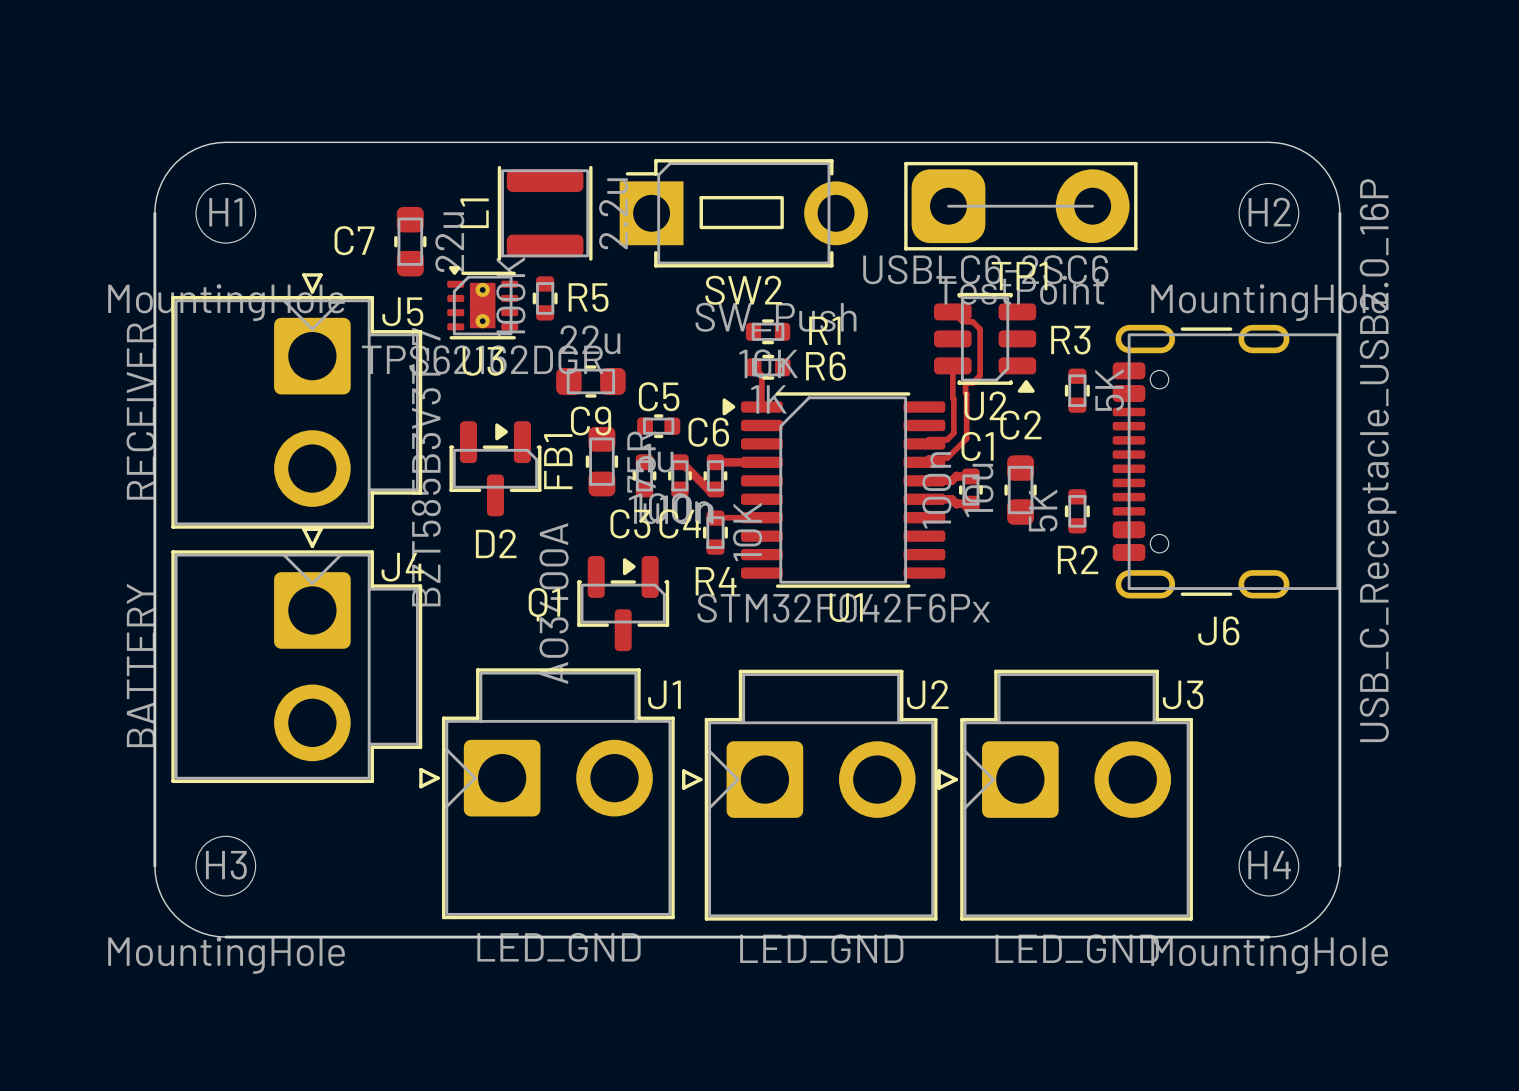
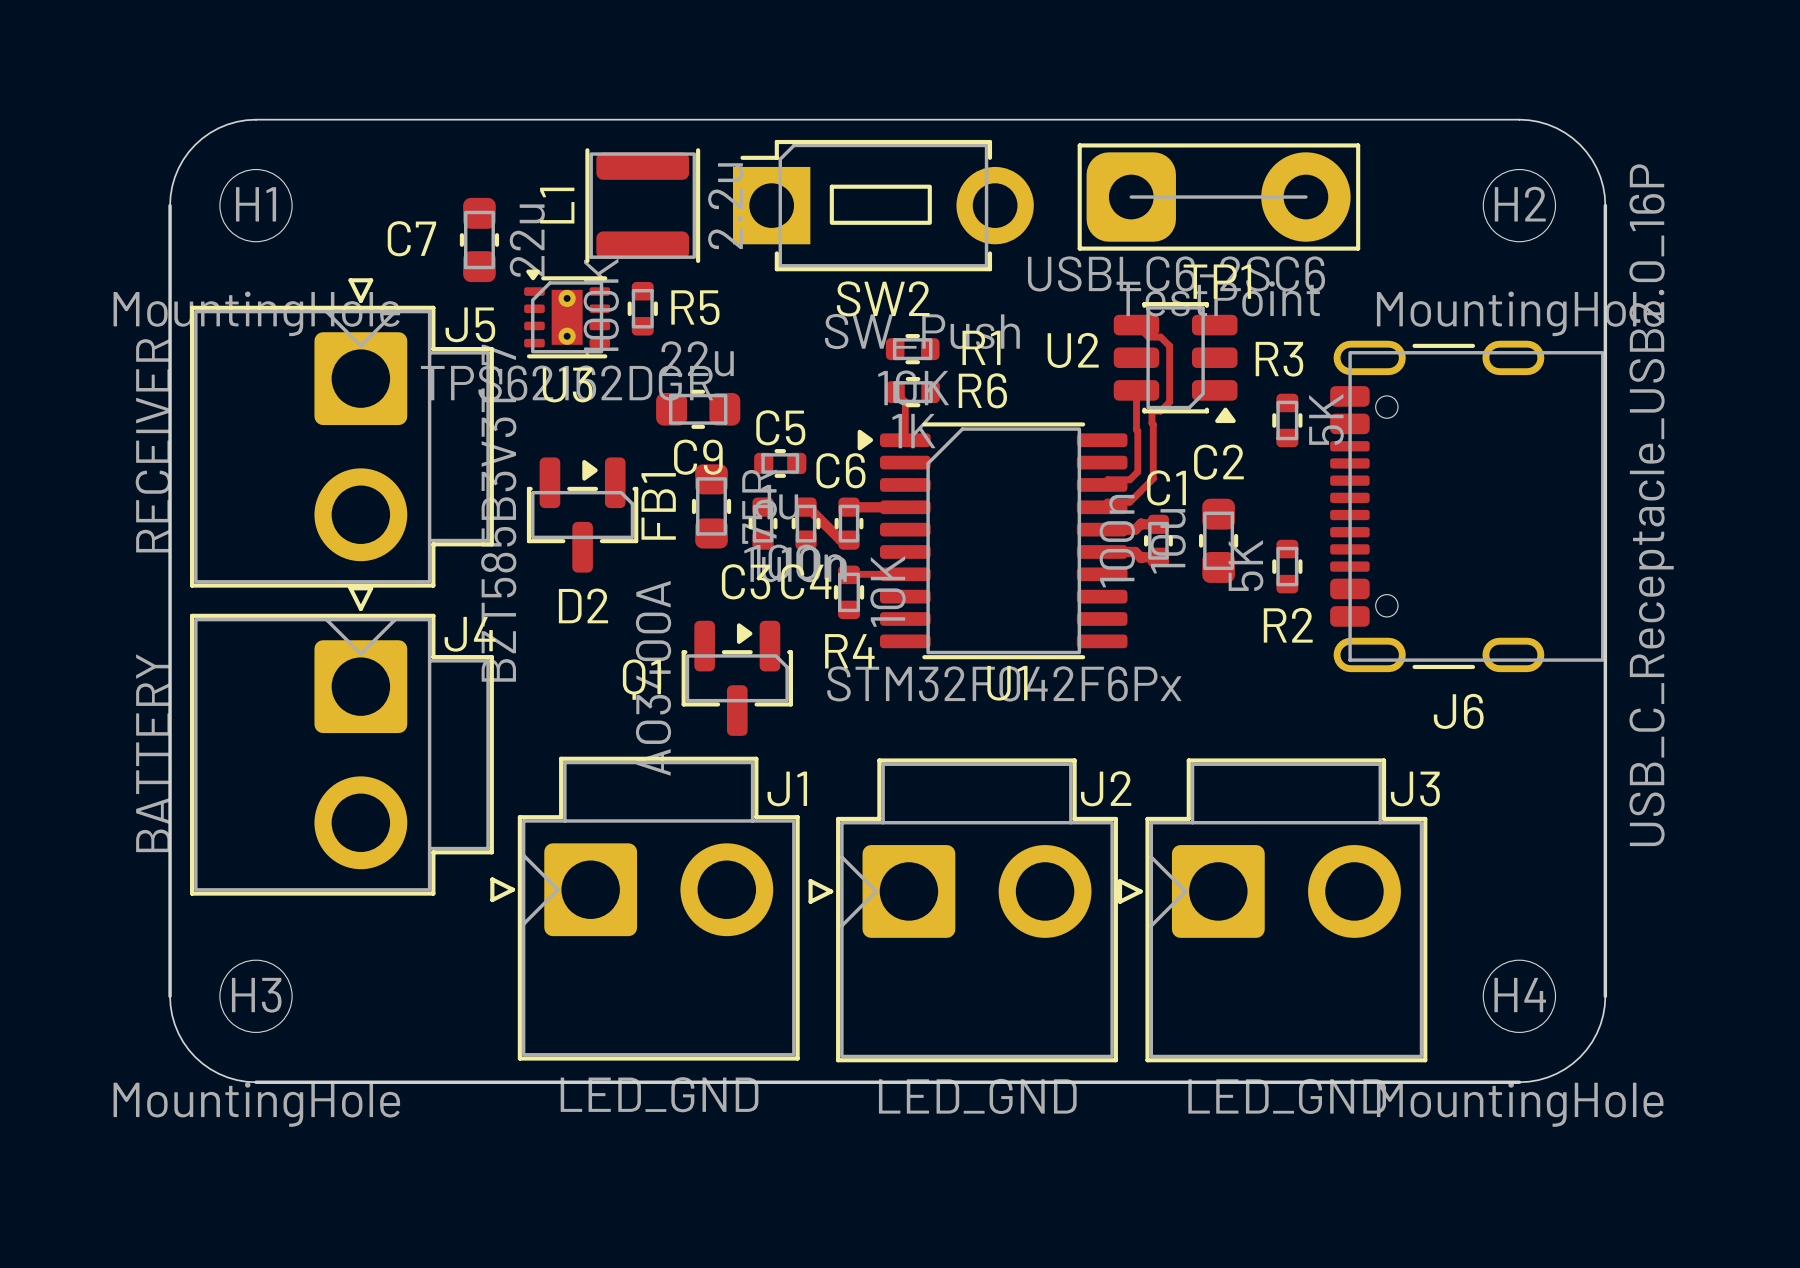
U2 name position: U2 (985, 405) -> U2 (1073, 350)

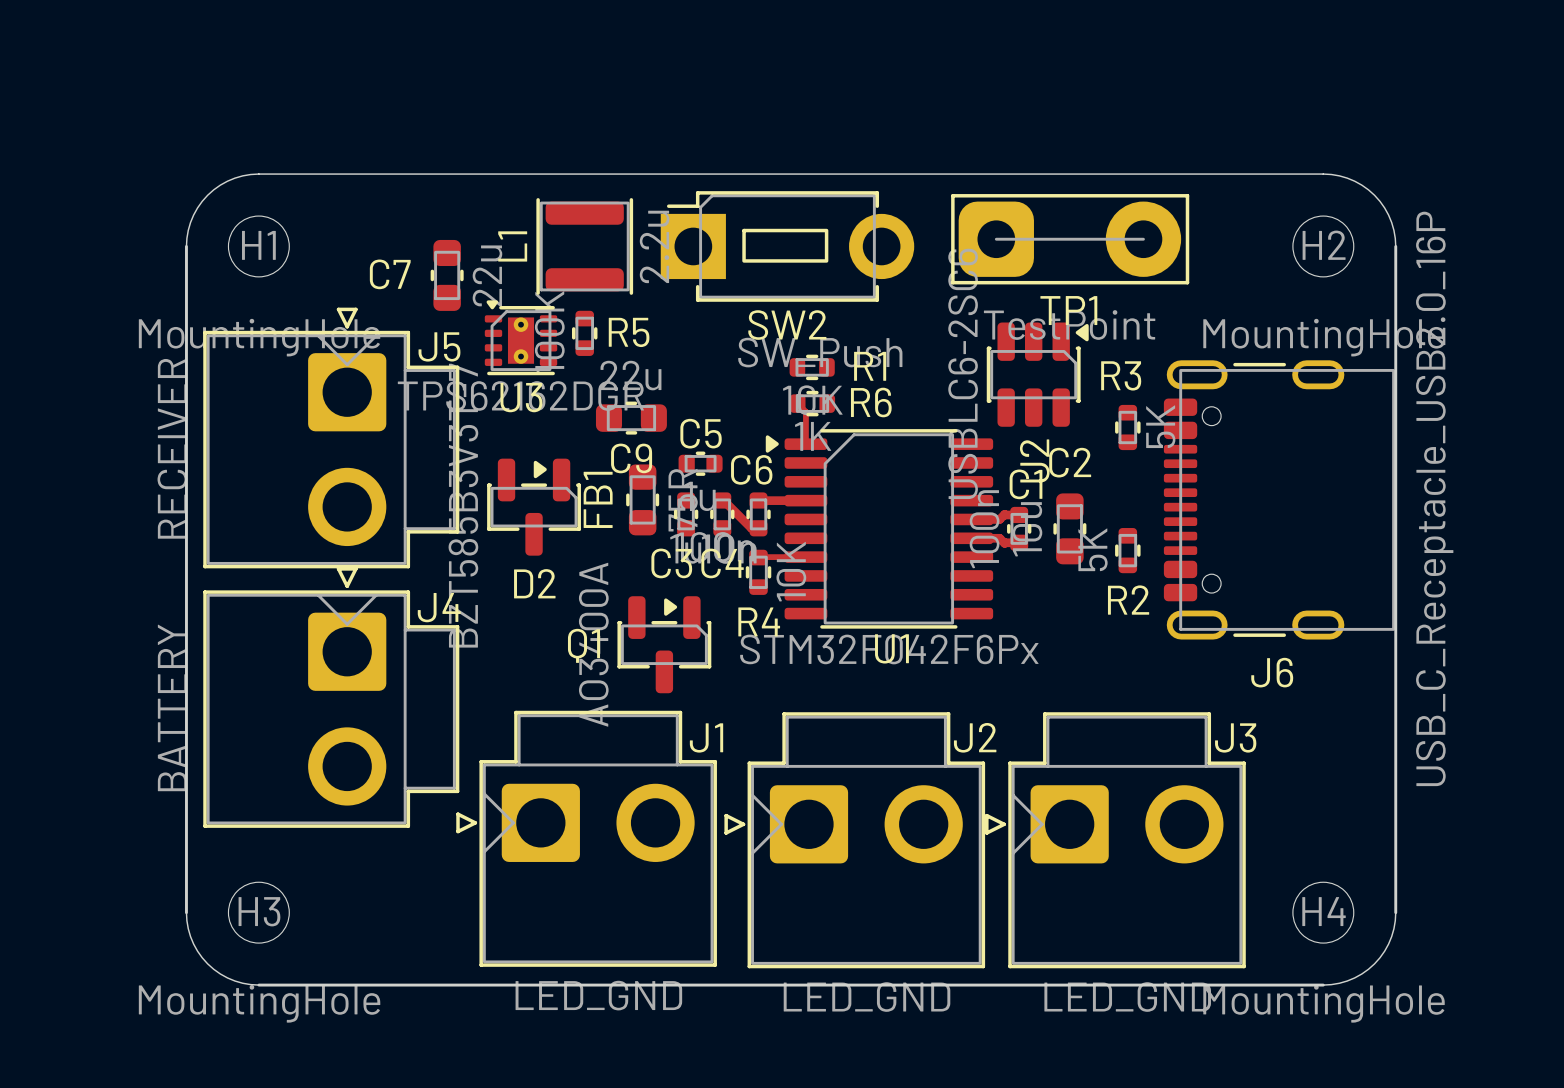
track: (1136, 325) (1148, 337) (1160, 337) (1169, 346) (1169, 402) (1160, 411) (1151, 411) (1153, 478) (1129, 502) (1107, 502) (1102, 507) -> none
U2 rotation: 0° (1175, 362) -> 90° counterclockwise (1037, 374)
track: (1136, 390) (1137, 471) (1129, 479) (1107, 479) (1102, 484) -> none

